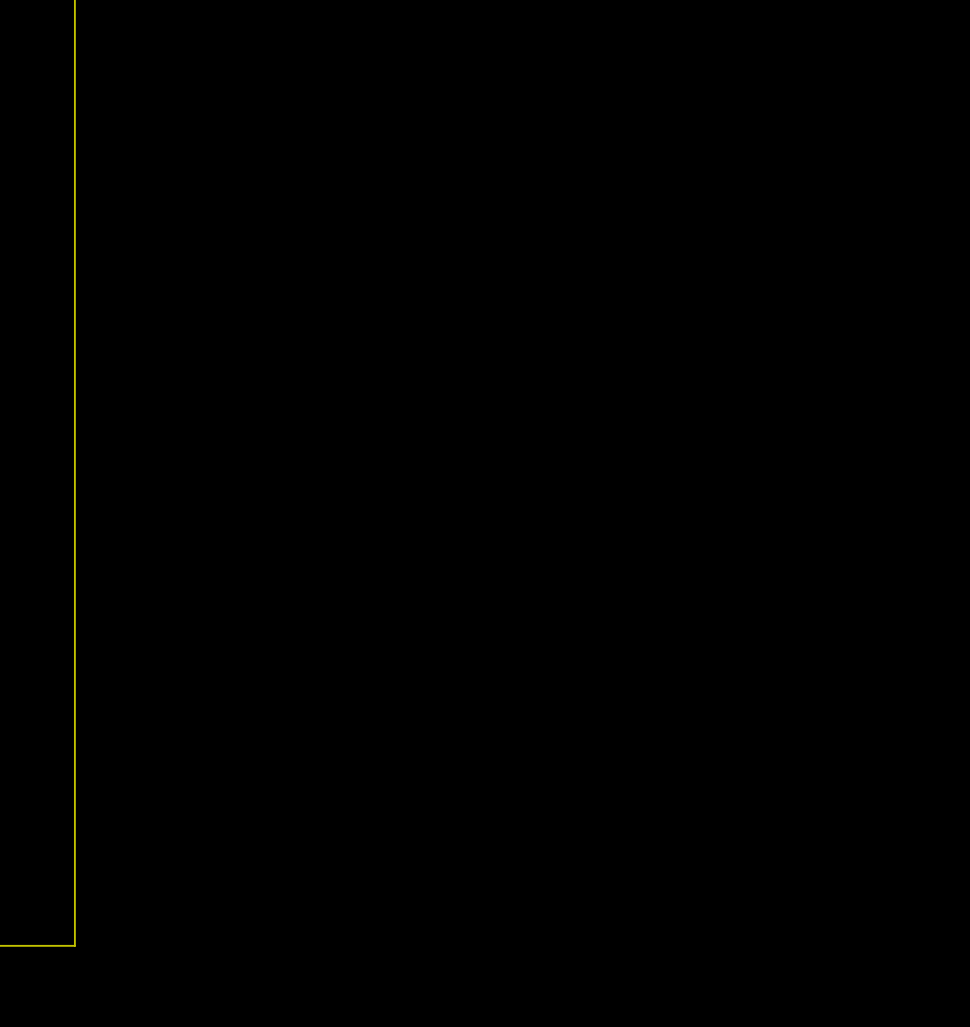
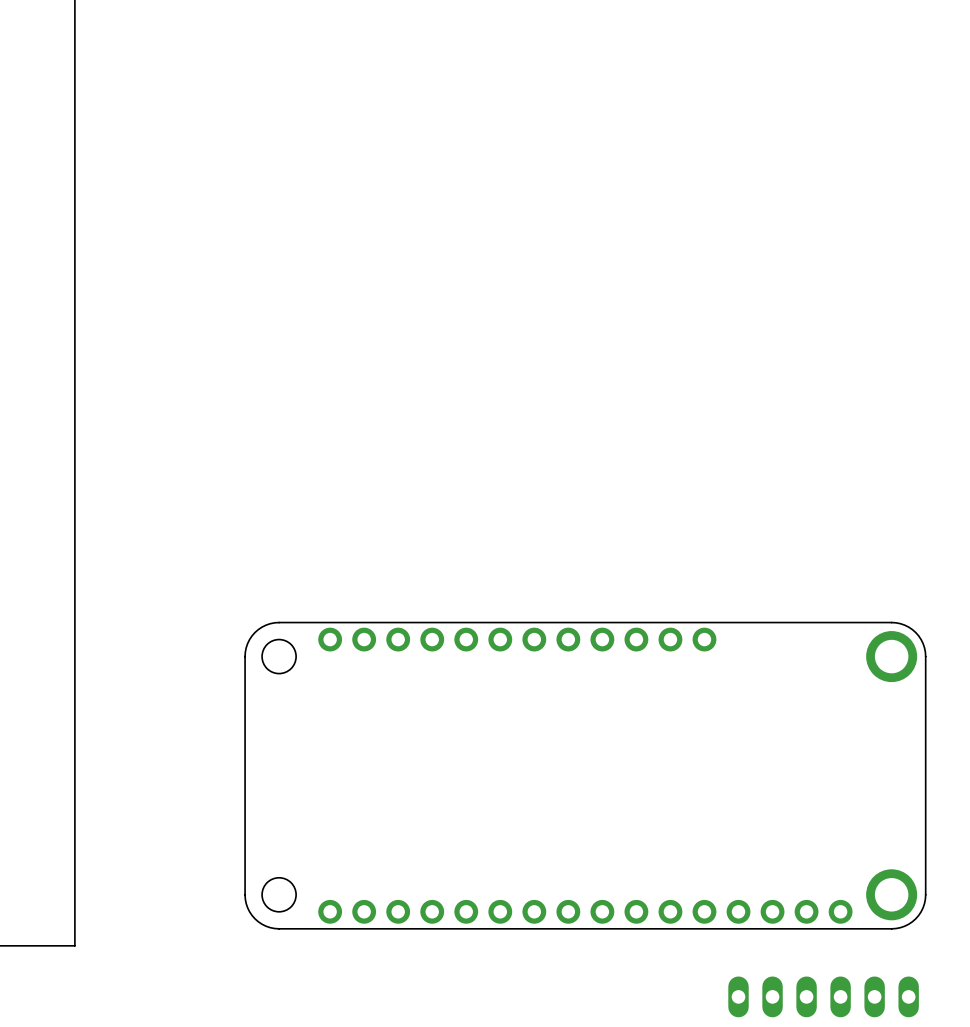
part: none -> (585, 775)
part: none -> (823, 996)

